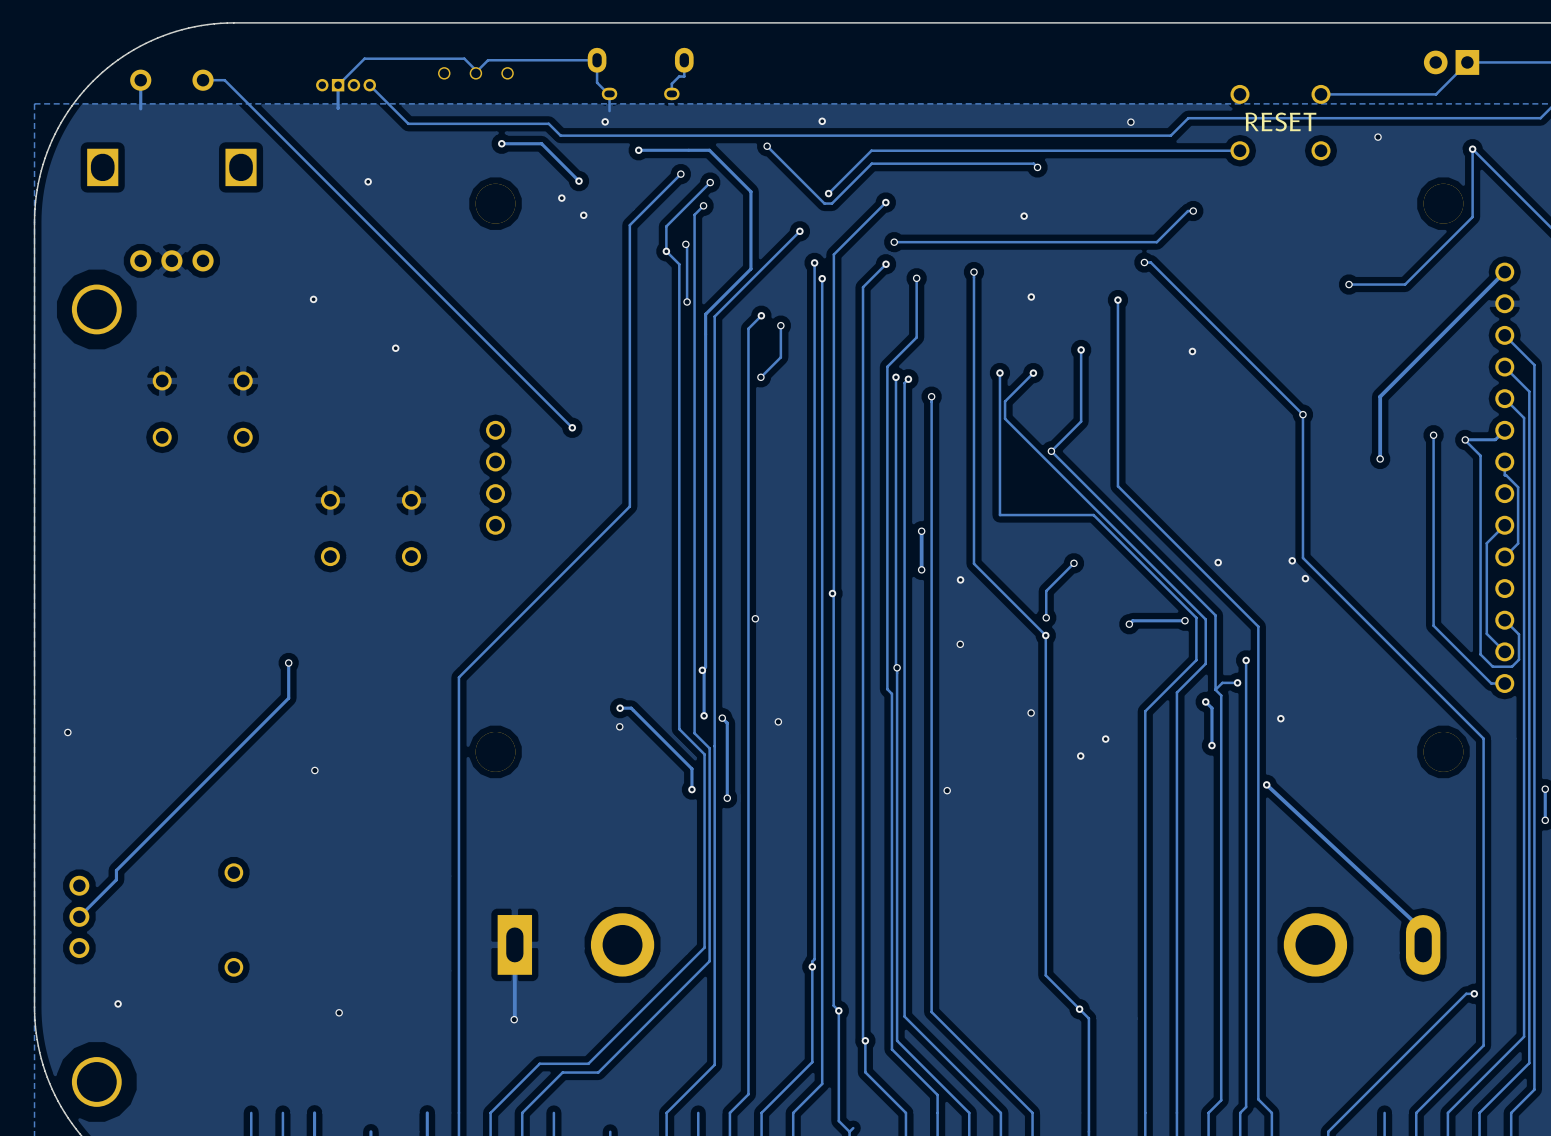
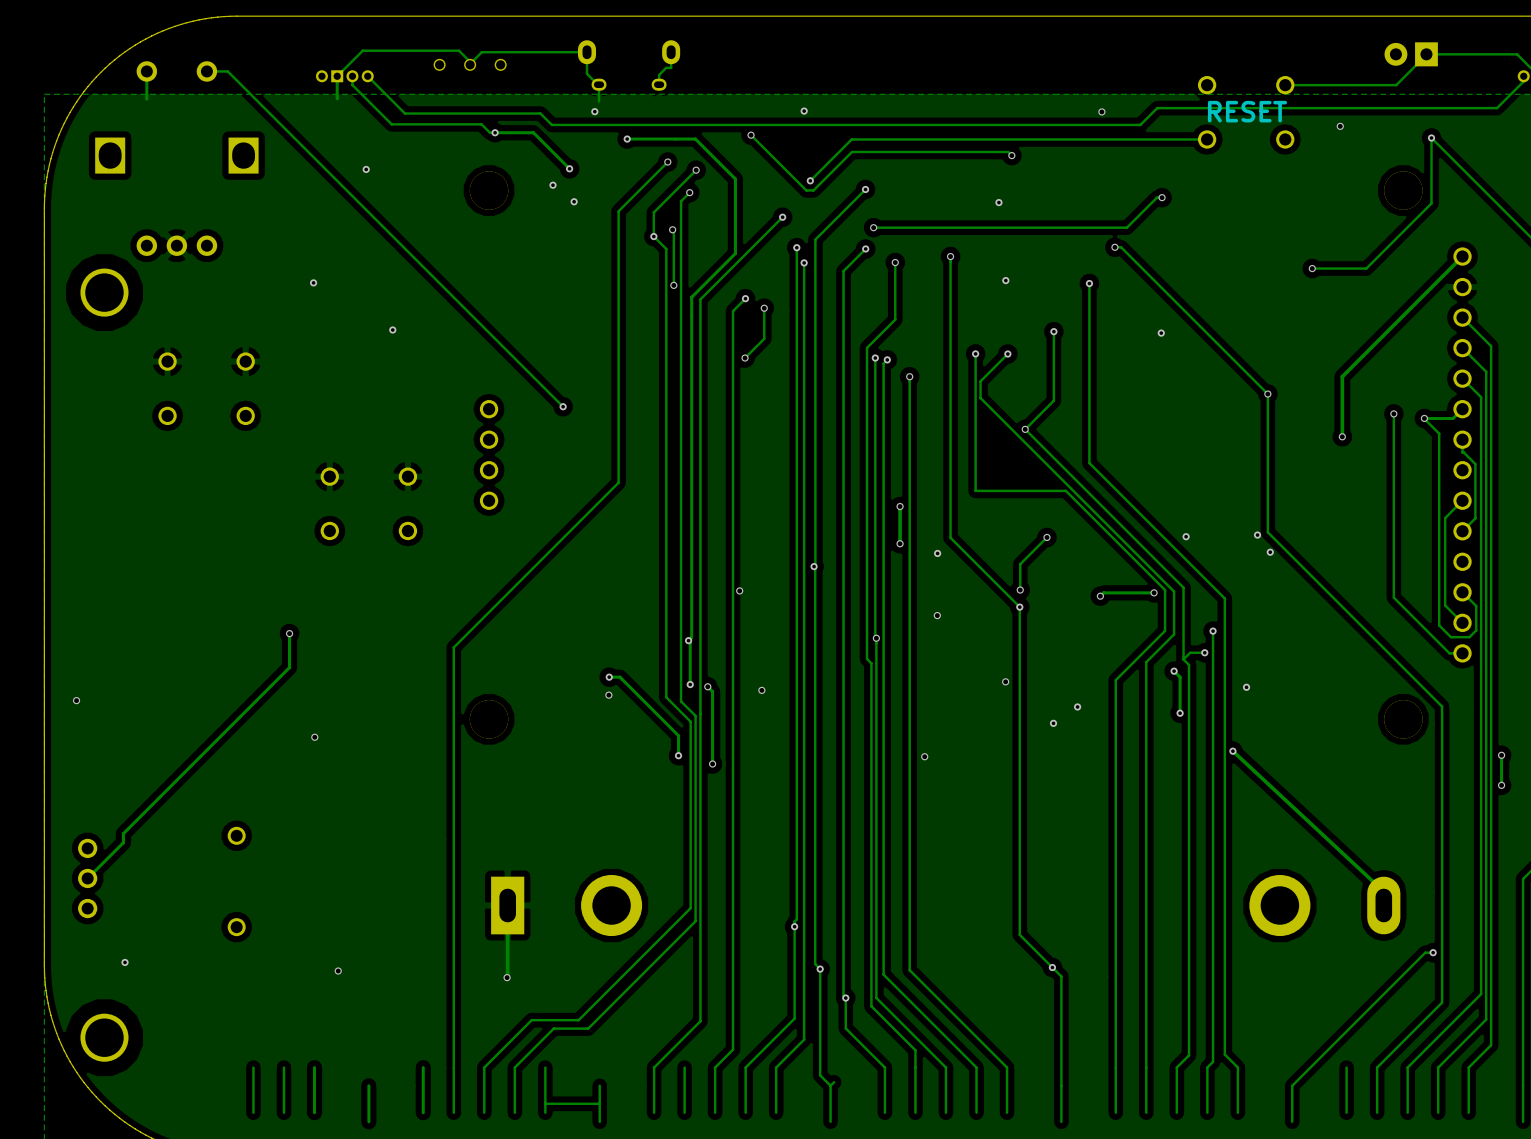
track: none -> (352, 76) (352, 85) (391, 124) (481, 124) (489, 132) (495, 132)

